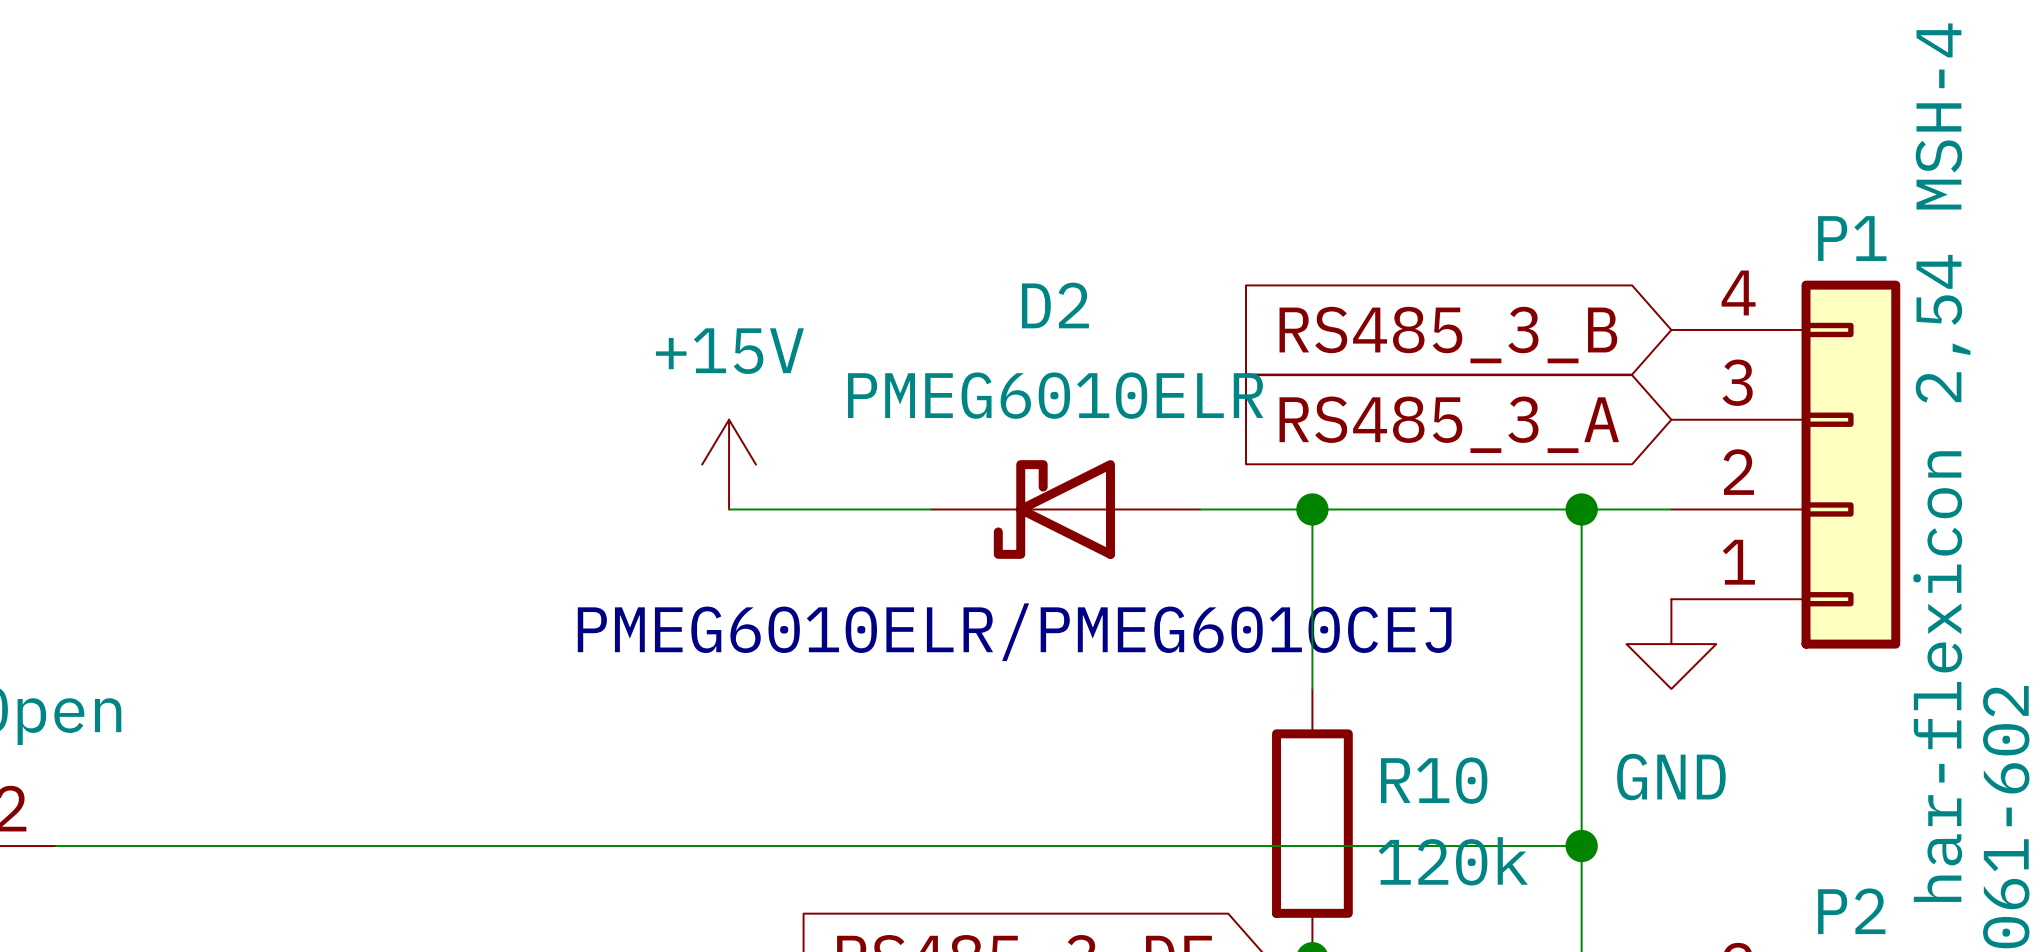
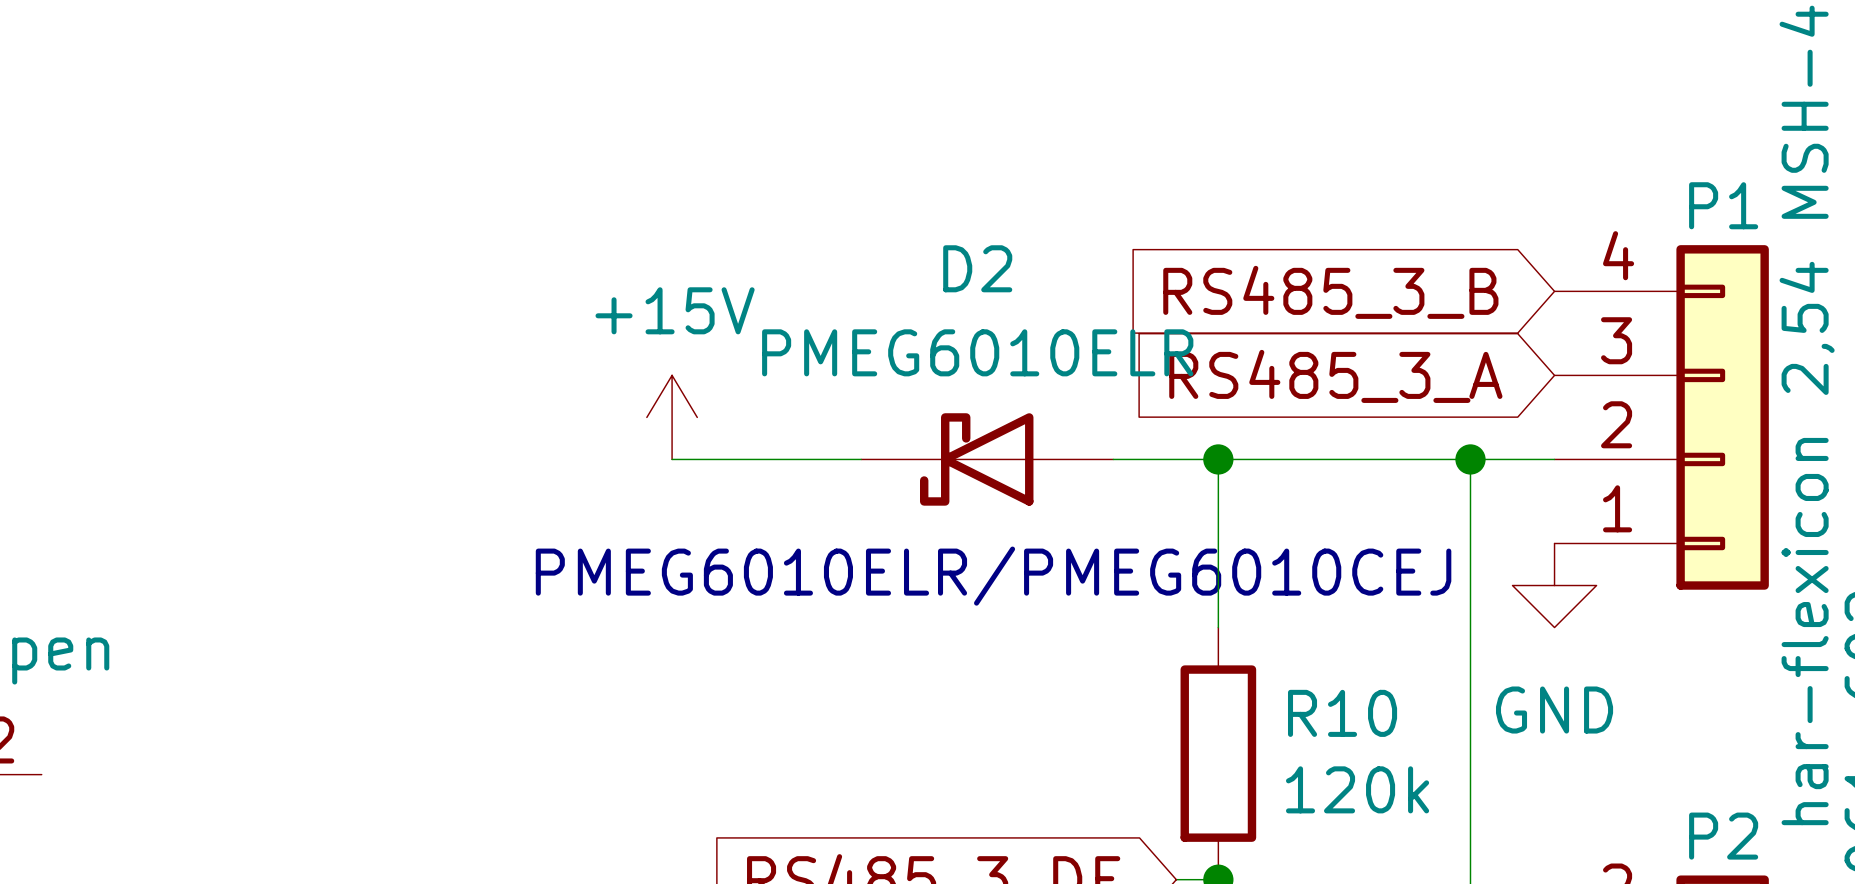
wire: (55, 846) (1581, 846) -> none
junction: (1581, 846) -> none

